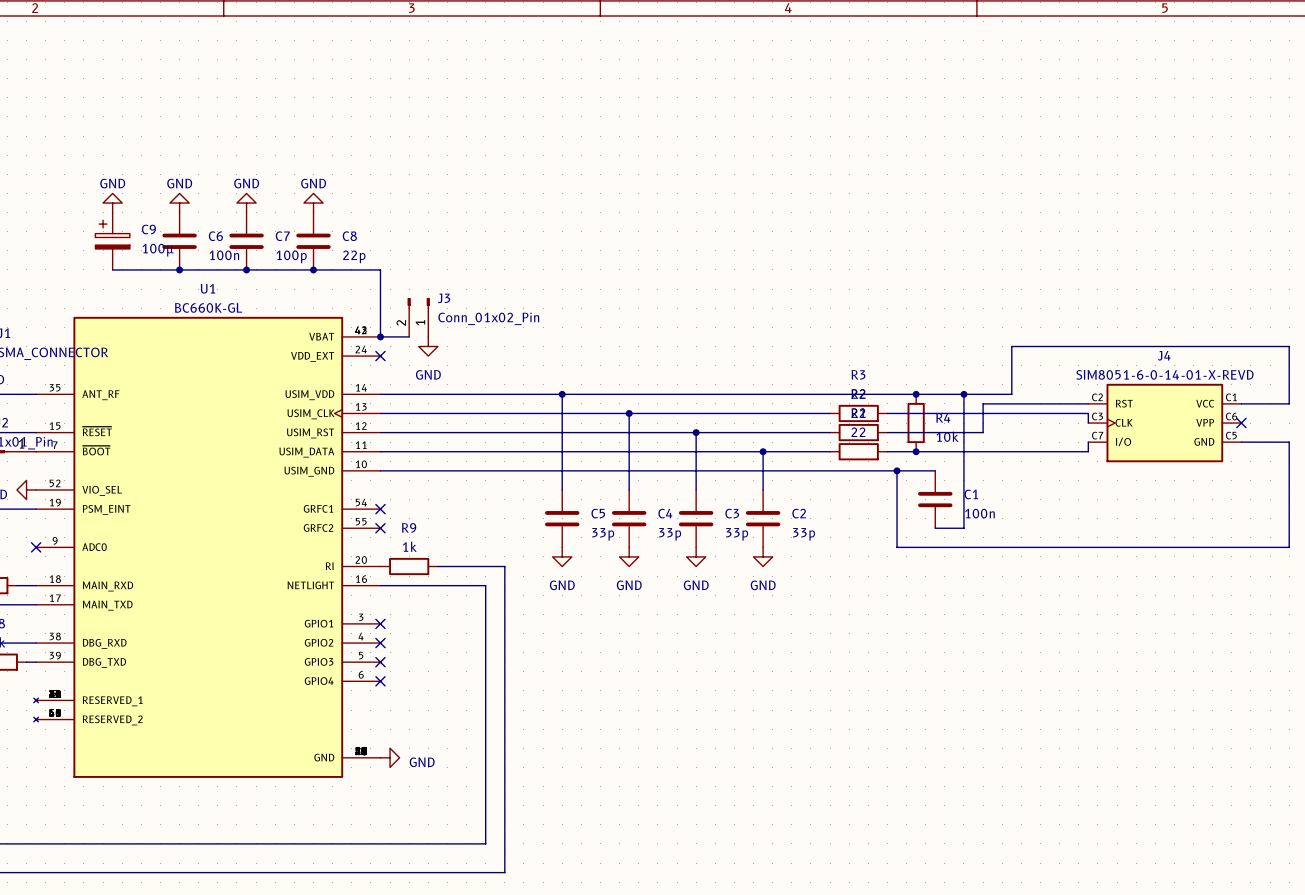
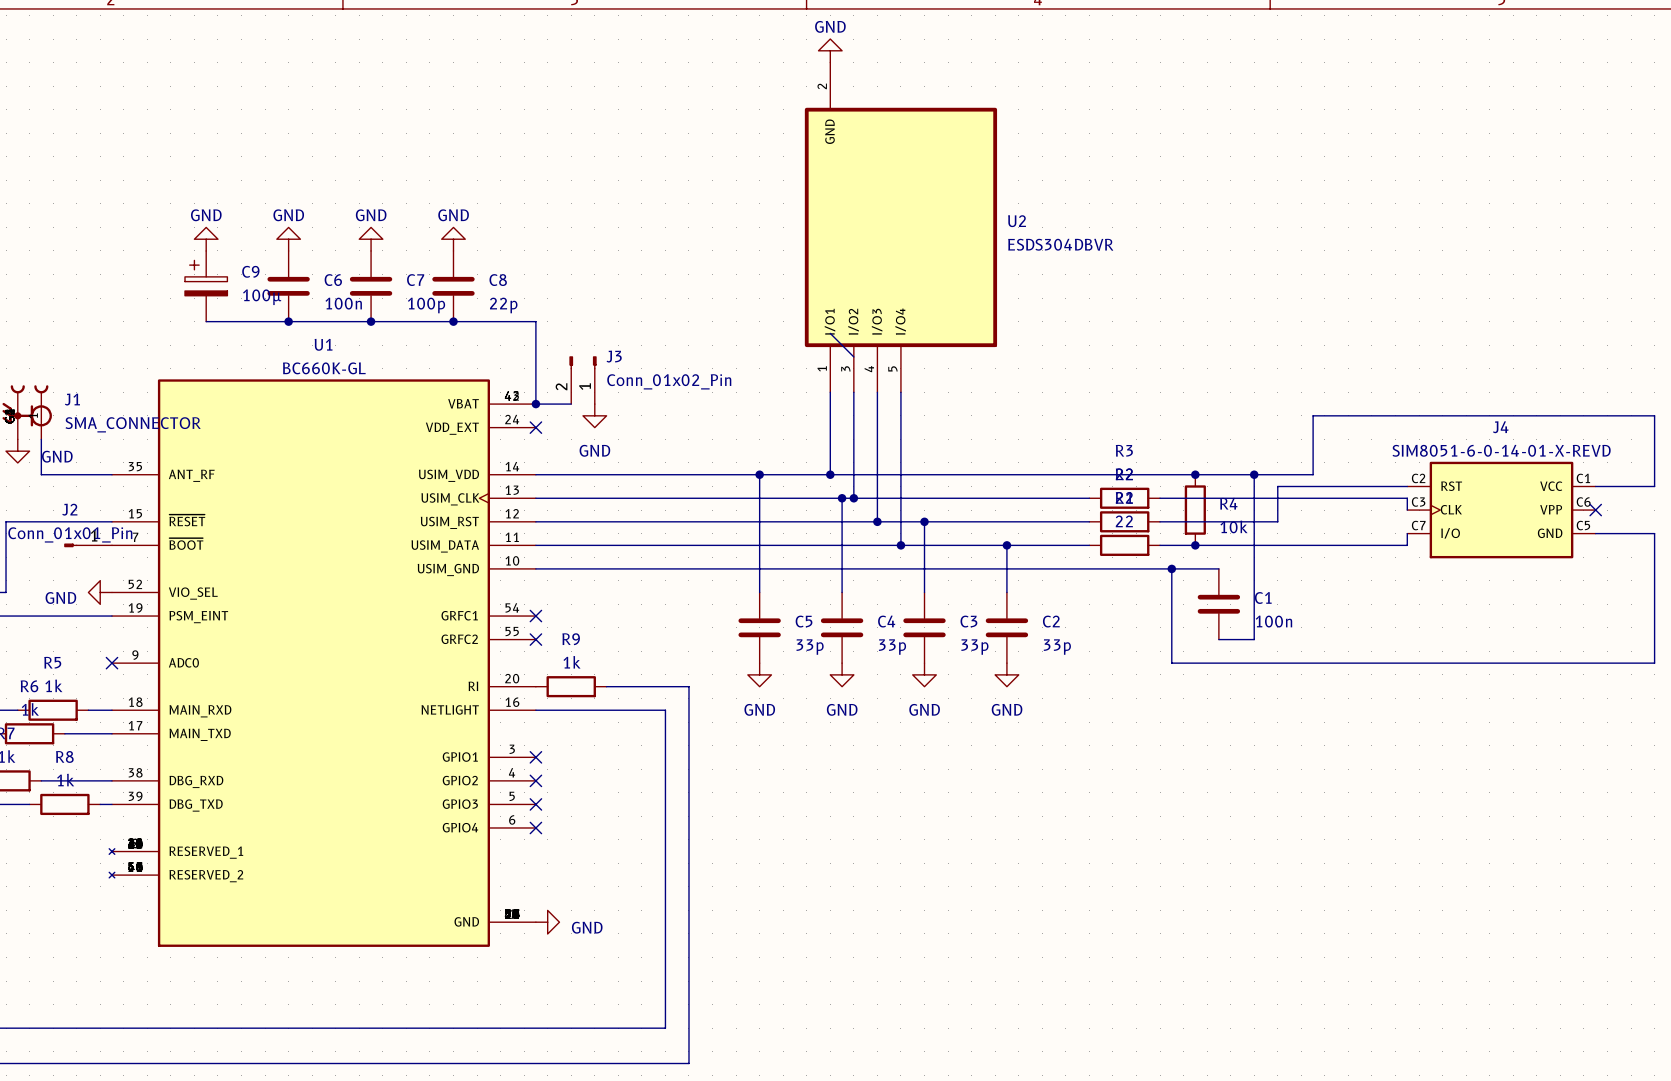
power symbol: none -> GND (830, 50)
U2: none -> ESDS304DBVR (900, 227)
wire: none -> (830, 333) (853, 356)
wire: none -> (830, 392) (830, 474)
wire: none -> (853, 392) (853, 498)
wire: none -> (877, 392) (877, 521)
wire: none -> (900, 392) (900, 545)
junction: none -> (830, 474)
junction: none -> (853, 498)
junction: none -> (877, 521)
junction: none -> (900, 545)

